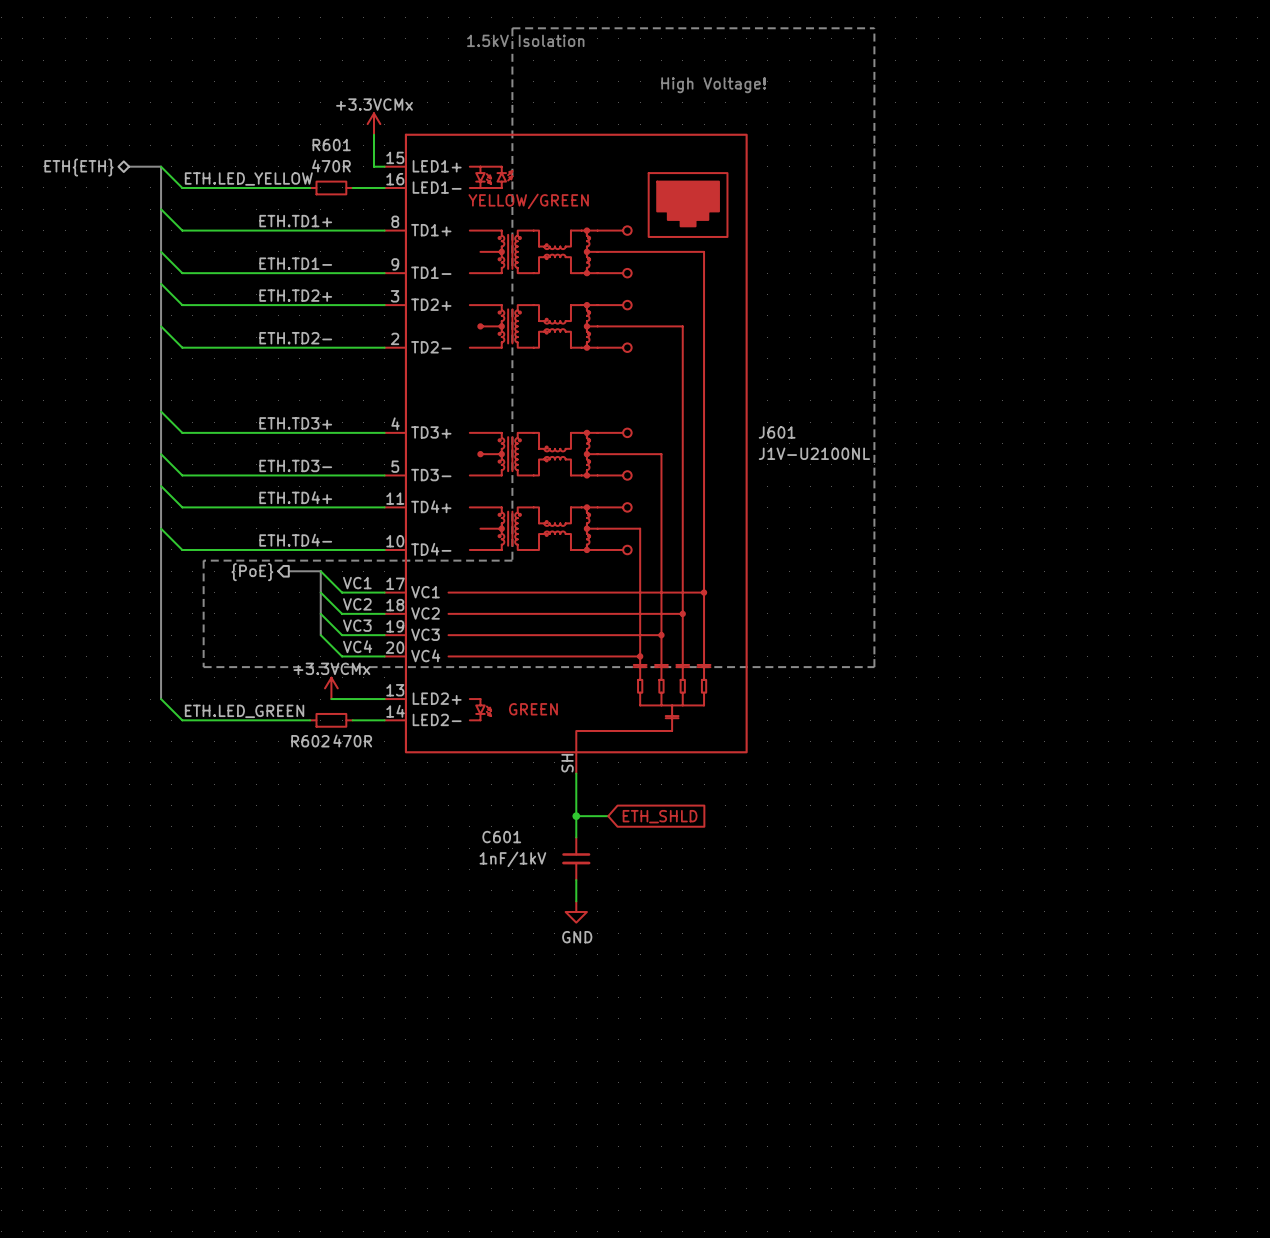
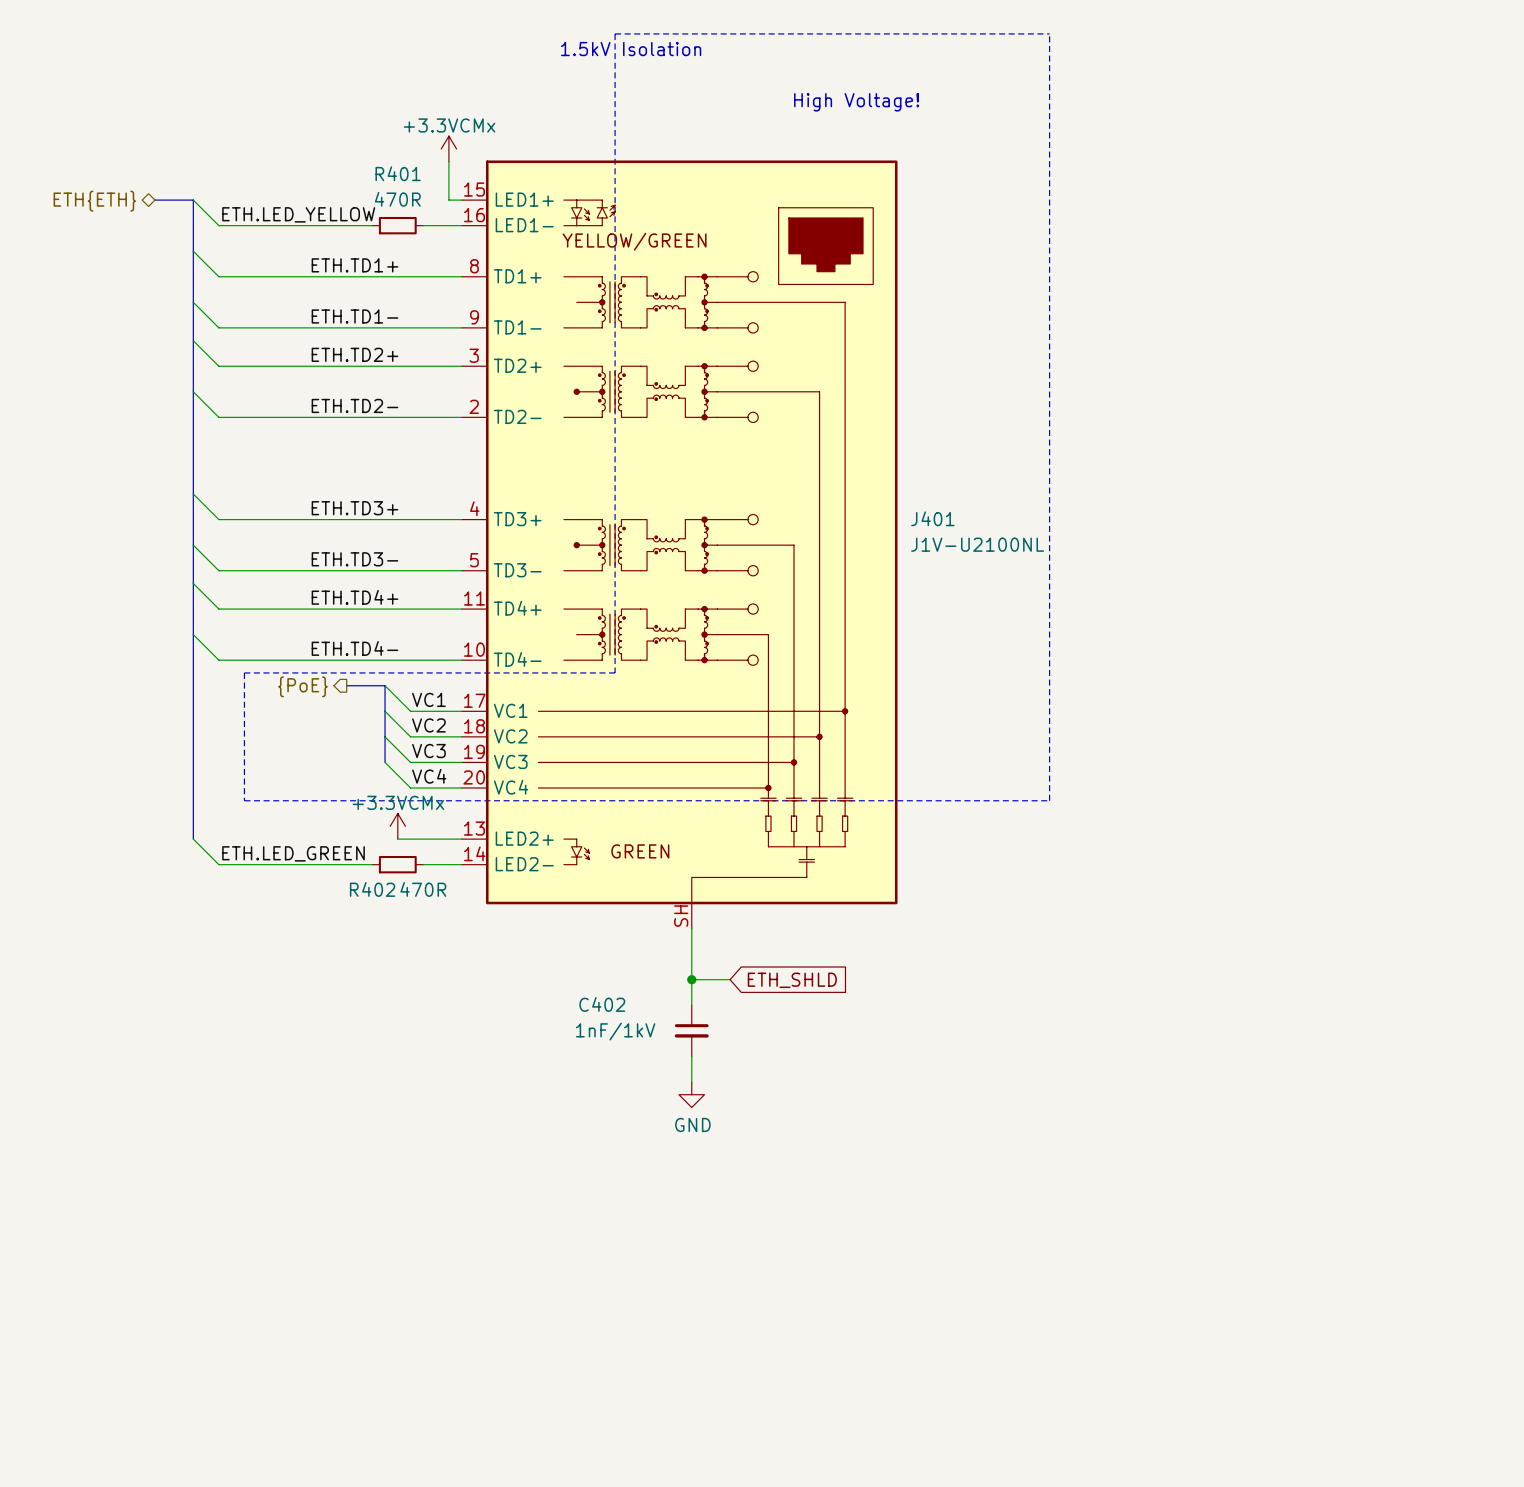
R601 name: R601 (331, 145) -> R401 (398, 173)
J601 name: J601 (777, 432) -> J401 (932, 518)
R602 name: R602 (310, 741) -> R402 (372, 889)
C601 name: C601 (501, 837) -> C402 (602, 1004)

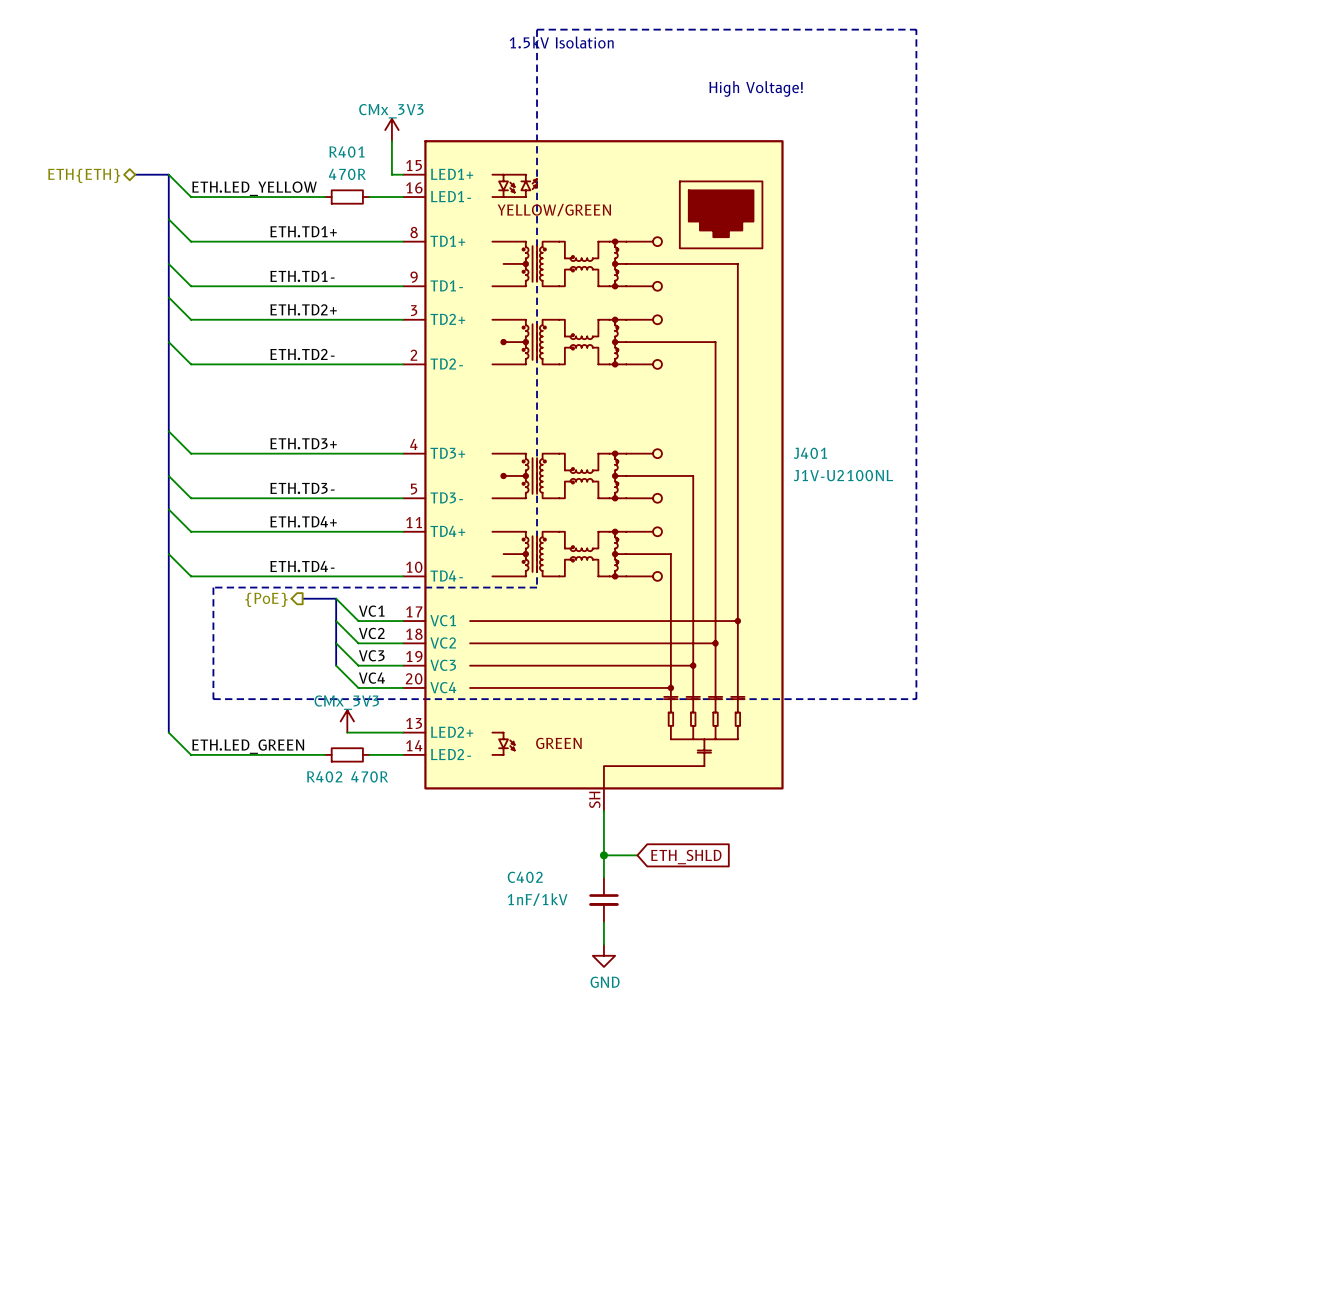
power symbol: +3.3VCMx (448, 148) -> CMx_3V3 (391, 130)
power symbol: +3.3VCMx (397, 826) -> CMx_3V3 (347, 721)

